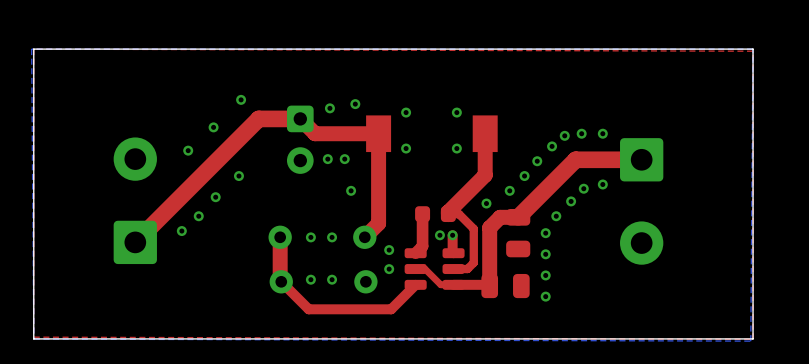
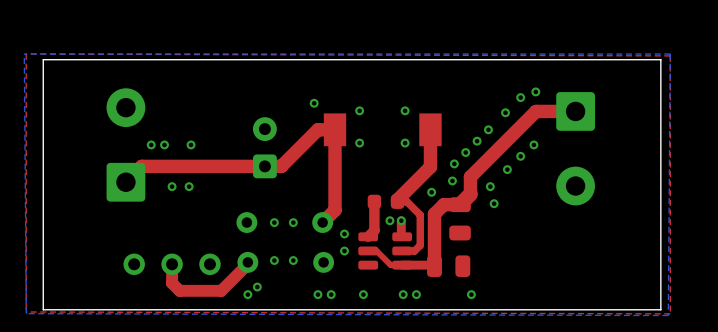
board edge: (753, 49) (33, 49) (33, 338) (753, 338) (753, 49) -> (660, 59) (660, 309) (43, 309) (43, 59) (660, 59)
via: none -> (535, 91)
via: none -> (520, 97)
via: (241, 99) -> none
via: (329, 108) -> none
via: none -> (505, 112)
via: (213, 127) -> none
top track: (359, 133) (315, 133) (300, 118) (258, 118) (135, 242) -> (317, 129) (281, 166) (141, 166) (125, 182)
via: none -> (488, 129)
via: (581, 133) -> none
via: (602, 133) -> none
via: (564, 135) -> none
part rotation: 0° (300, 139) -> 180° (264, 147)
via: none -> (477, 141)
via: (552, 146) -> none
via: none -> (151, 144)
via: none -> (191, 144)
via: none -> (533, 144)
via: (327, 159) -> none
via: (344, 159) -> none
via: none -> (465, 152)
top track: (641, 159) (575, 159) (529, 205) -> (575, 111) (535, 111) (470, 176) (470, 194)
via: (537, 161) -> none
via: none -> (520, 156)
via: none -> (454, 163)
via: (238, 176) -> none
via: (524, 176) -> none
via: none -> (507, 169)
via: (602, 184) -> none
via: (583, 188) -> none
via: (351, 190) -> none
via: none -> (172, 186)
via: none -> (490, 186)
part position: (135, 200) -> (125, 144)
via: (571, 201) -> none
part position: (641, 201) -> (575, 148)
via: (198, 216) -> none
via: (181, 231) -> none
via: (545, 233) -> none
top track: (280, 237) (280, 280) -> none
via: (545, 254) -> none
via: (545, 275) -> none
top track: (281, 281) (308, 309) (391, 309) (415, 284) -> none
part: none -> (172, 264)
top track: none -> (247, 264) (221, 290) (179, 290) (172, 283) (172, 264)
via: (545, 296) -> none
via: none -> (257, 287)
via: none -> (247, 294)
via: none -> (317, 294)
via: none -> (331, 294)
via: none -> (363, 294)
via: none -> (403, 294)
via: none -> (416, 294)
via: none -> (471, 294)

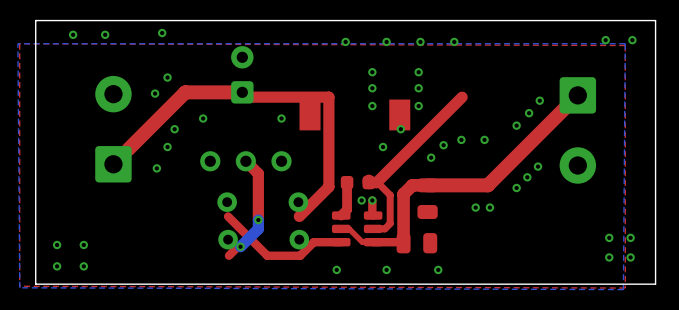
via: none -> (162, 33)
via: none -> (73, 34)
via: none -> (105, 34)
via: none -> (605, 40)
via: none -> (632, 40)
via: none -> (345, 41)
via: none -> (386, 41)
via: none -> (420, 41)
via: none -> (454, 41)
board edge: (43, 59) (660, 59) (660, 309) -> (35, 49) (35, 20) (655, 20) (655, 284) (616, 284)
via: none -> (372, 72)
via: none -> (418, 72)
via: none -> (167, 77)
via: (535, 91) -> none
via: (520, 97) -> none
via: none -> (372, 88)
via: none -> (418, 88)
via: (314, 103) -> none
via: none -> (155, 93)
via: (359, 110) -> none
via: (405, 110) -> none
top track: none -> (462, 97) (376, 182) (368, 182)
top track: (575, 111) (535, 111) (470, 176) (470, 194) (460, 204) -> (577, 95) (487, 185) (427, 185)
via: (505, 112) -> none
via: none -> (539, 100)
via: none -> (372, 106)
via: none -> (418, 106)
via: none -> (529, 113)
top track: (430, 129) (430, 166) (397, 199) -> none
via: (488, 129) -> none
via: none -> (203, 118)
via: none -> (281, 118)
via: (477, 141) -> none
via: none -> (516, 125)
via: (359, 143) -> none
via: (405, 143) -> none
via: (151, 144) -> none
via: (164, 144) -> none
via: none -> (400, 129)
via: (533, 144) -> none
part position: (264, 147) -> (242, 74)
part position: (575, 148) -> (577, 130)
via: (465, 152) -> none
via: none -> (461, 139)
via: none -> (443, 145)
via: none -> (167, 147)
via: none -> (383, 147)
via: (454, 163) -> none
top track: (141, 166) (281, 166) (317, 129) (335, 129) (335, 210) (322, 222) -> (128, 149) (185, 92) (242, 92) (247, 97) (328, 97) (328, 186) (299, 216)
via: (507, 169) -> none
via: none -> (431, 157)
top track: none -> (245, 161) (258, 173) (258, 220)
via: (452, 180) -> none
via: none -> (538, 166)
via: (189, 186) -> none
via: (490, 186) -> none
via: (431, 192) -> none
via: none -> (527, 177)
via: (494, 203) -> none
via: none -> (516, 187)
via: (274, 222) -> none
via: (293, 222) -> none
via: none -> (475, 207)
via: none -> (489, 207)
via: (344, 233) -> none
top track: none -> (228, 216) (267, 255) (300, 255) (313, 242) (341, 242)
bottom track: none -> (258, 220) (258, 228) (240, 246)
via: none -> (258, 220)
via: (344, 251) -> none
via: (274, 260) -> none
via: (293, 260) -> none
via: none -> (609, 237)
via: none -> (630, 237)
part position: (172, 264) -> (245, 161)
top track: (247, 264) (221, 290) (179, 290) (172, 283) (172, 264) -> none
via: none -> (57, 244)
via: none -> (83, 244)
top track: none -> (240, 246) (237, 246) (229, 255)
via: none -> (240, 246)
via: none -> (609, 257)
via: none -> (630, 257)
via: (257, 287) -> none
via: none -> (57, 266)
via: none -> (83, 266)
via: (247, 294) -> none
via: (317, 294) -> none
via: (331, 294) -> none
via: (403, 294) -> none

